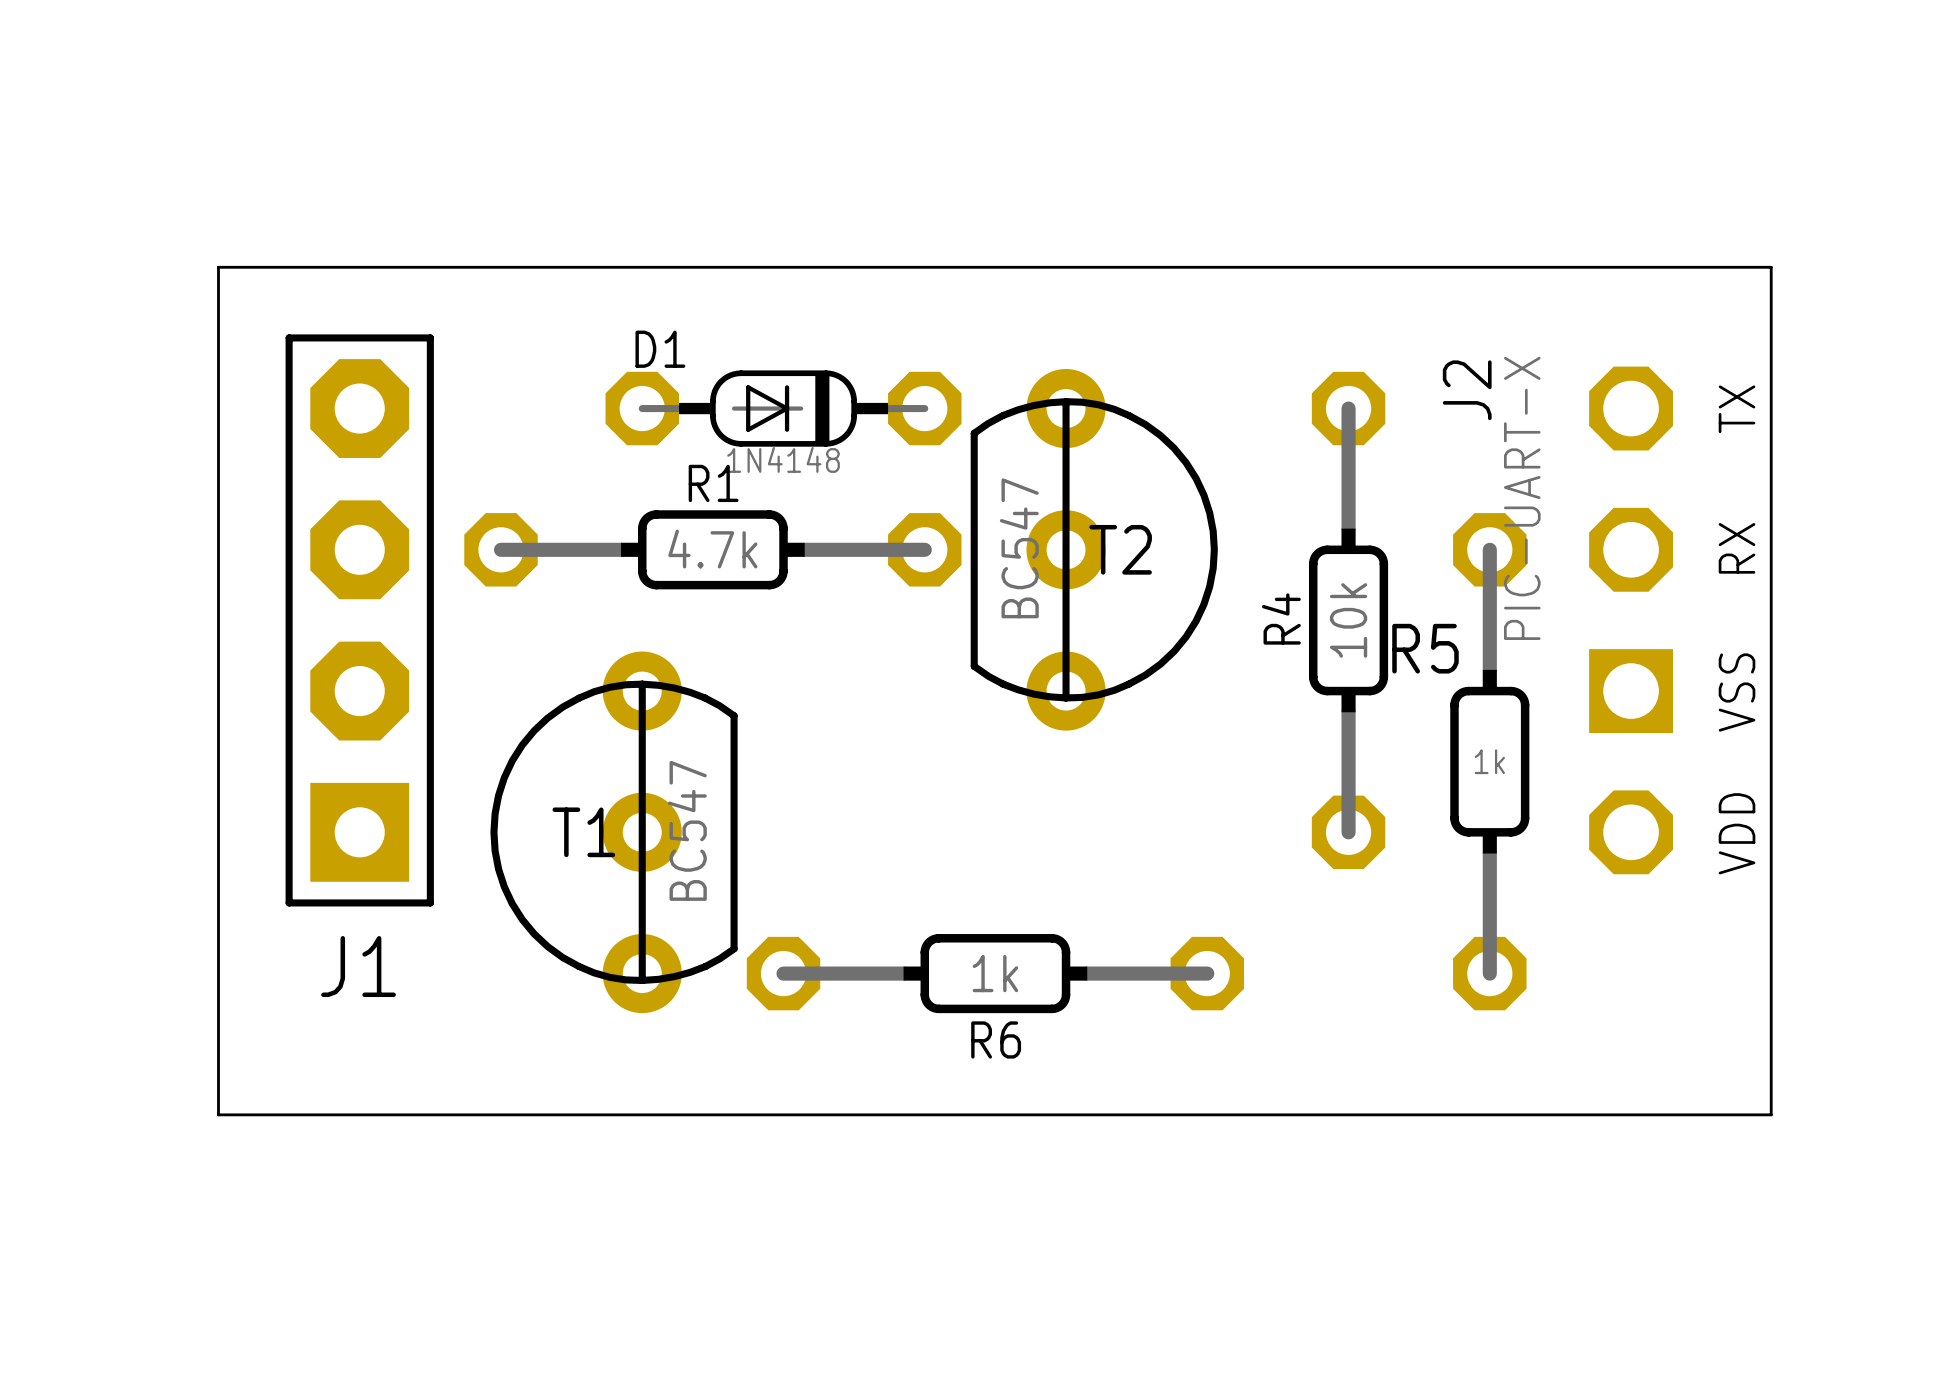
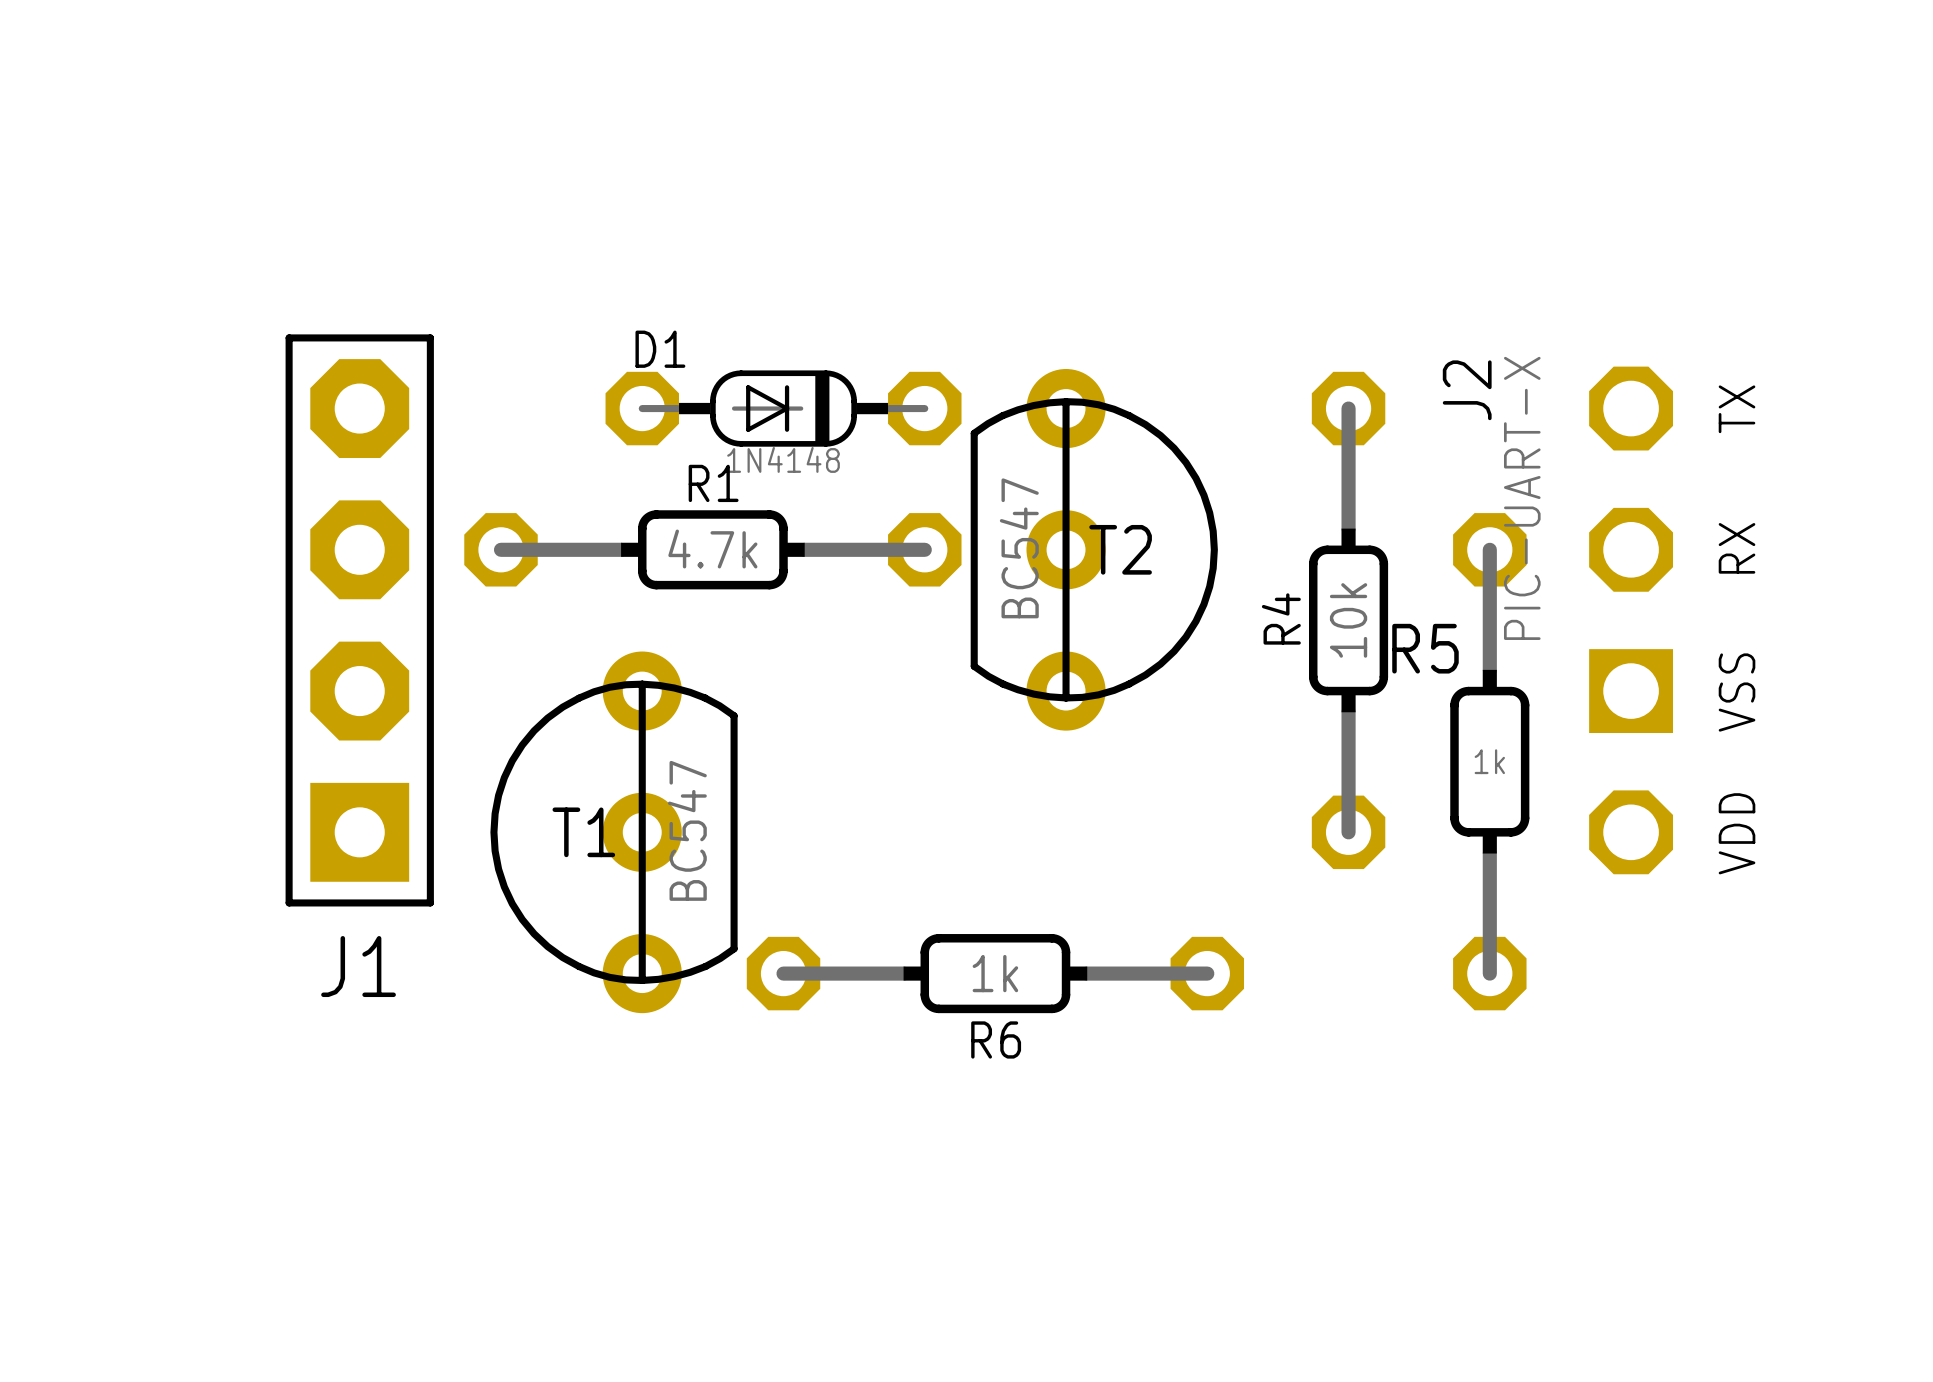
board edge: (218, 267) (1771, 267) (1771, 1114) (218, 1114) (218, 267) -> none

